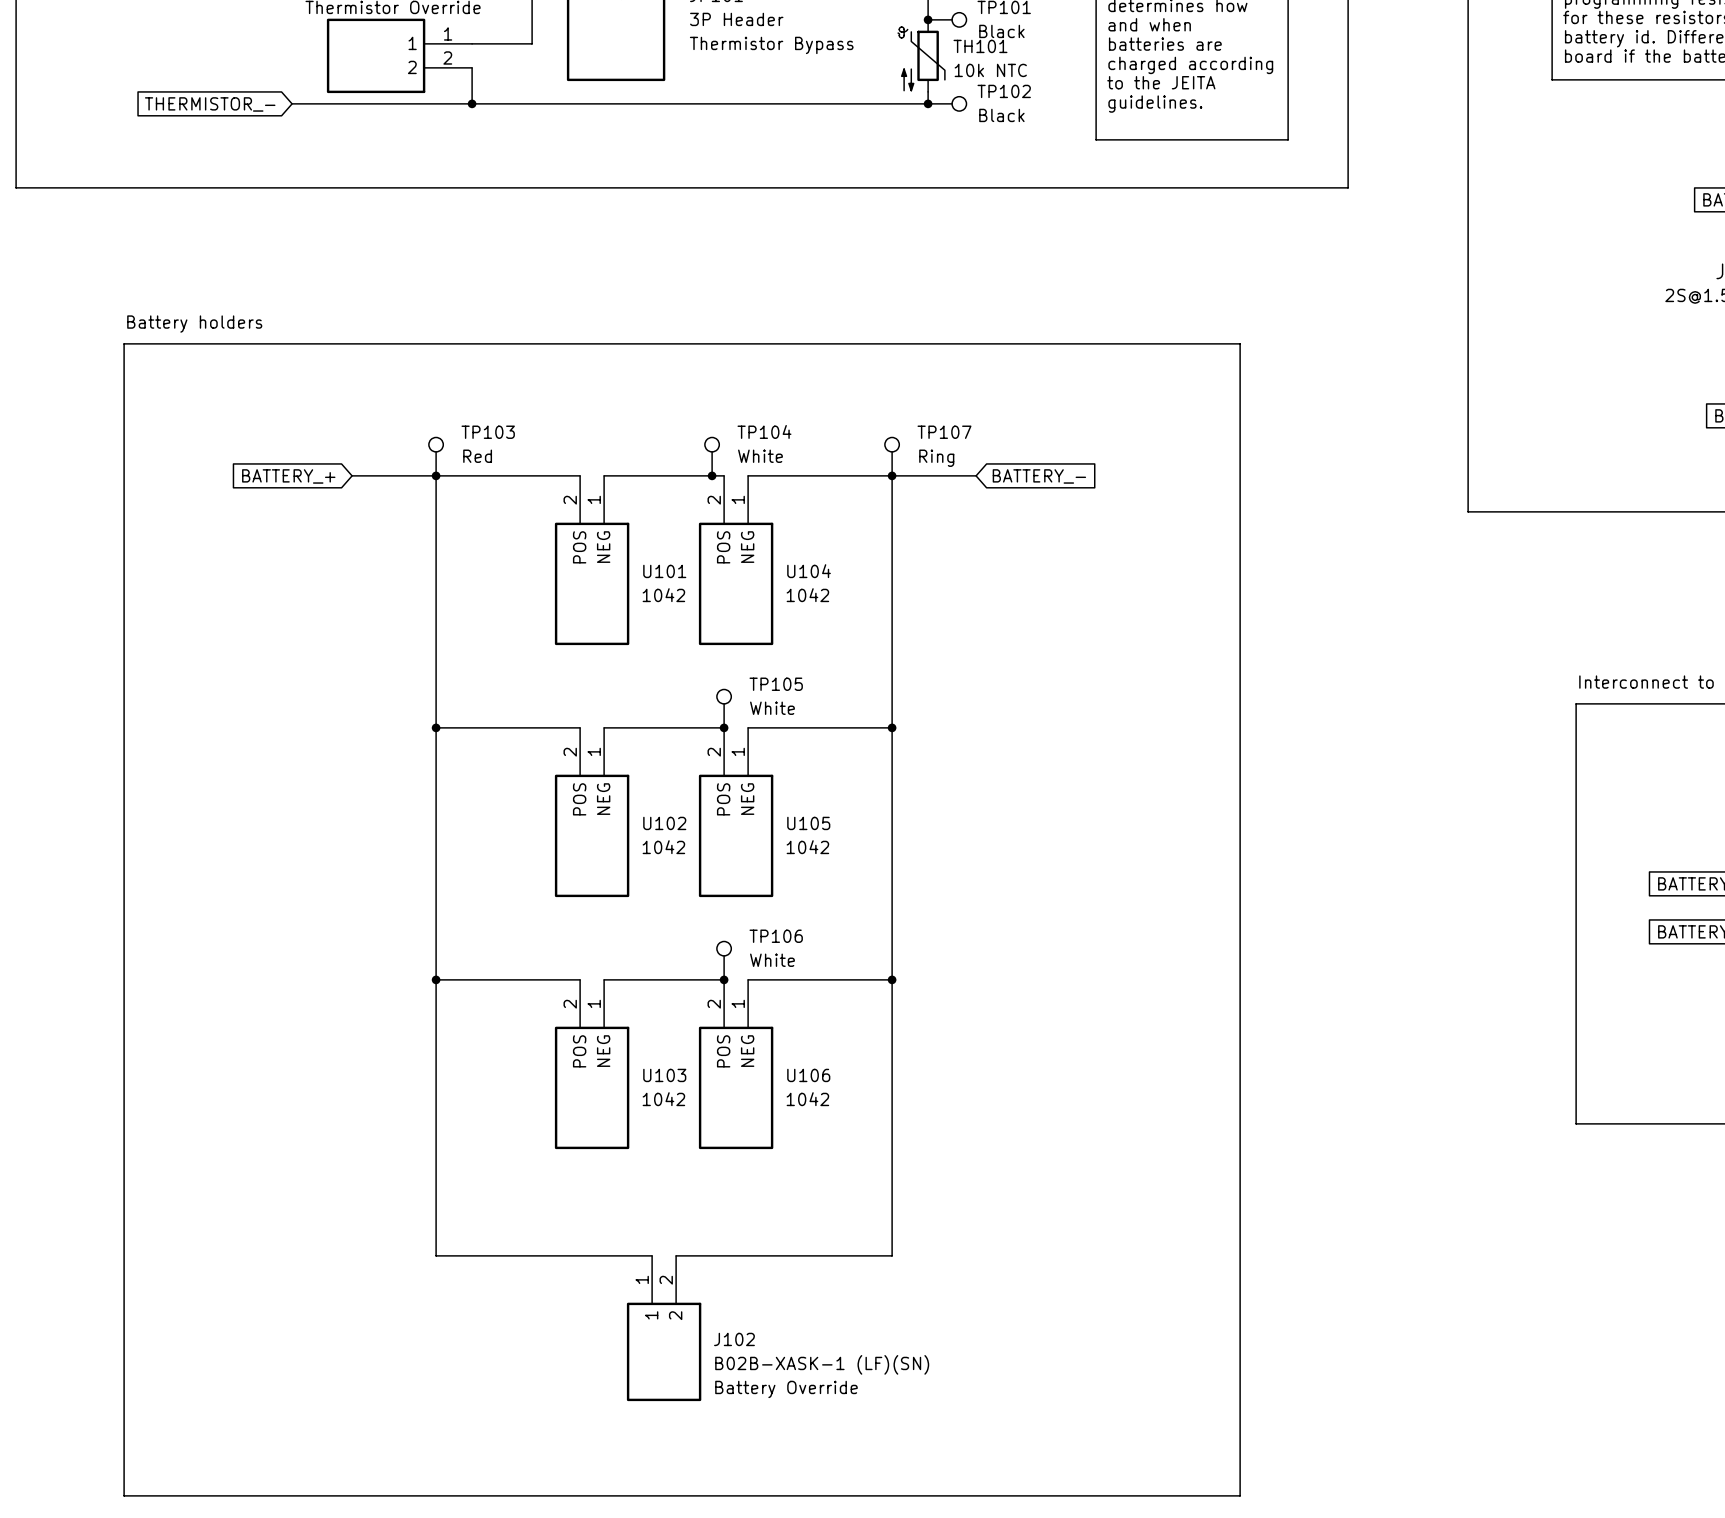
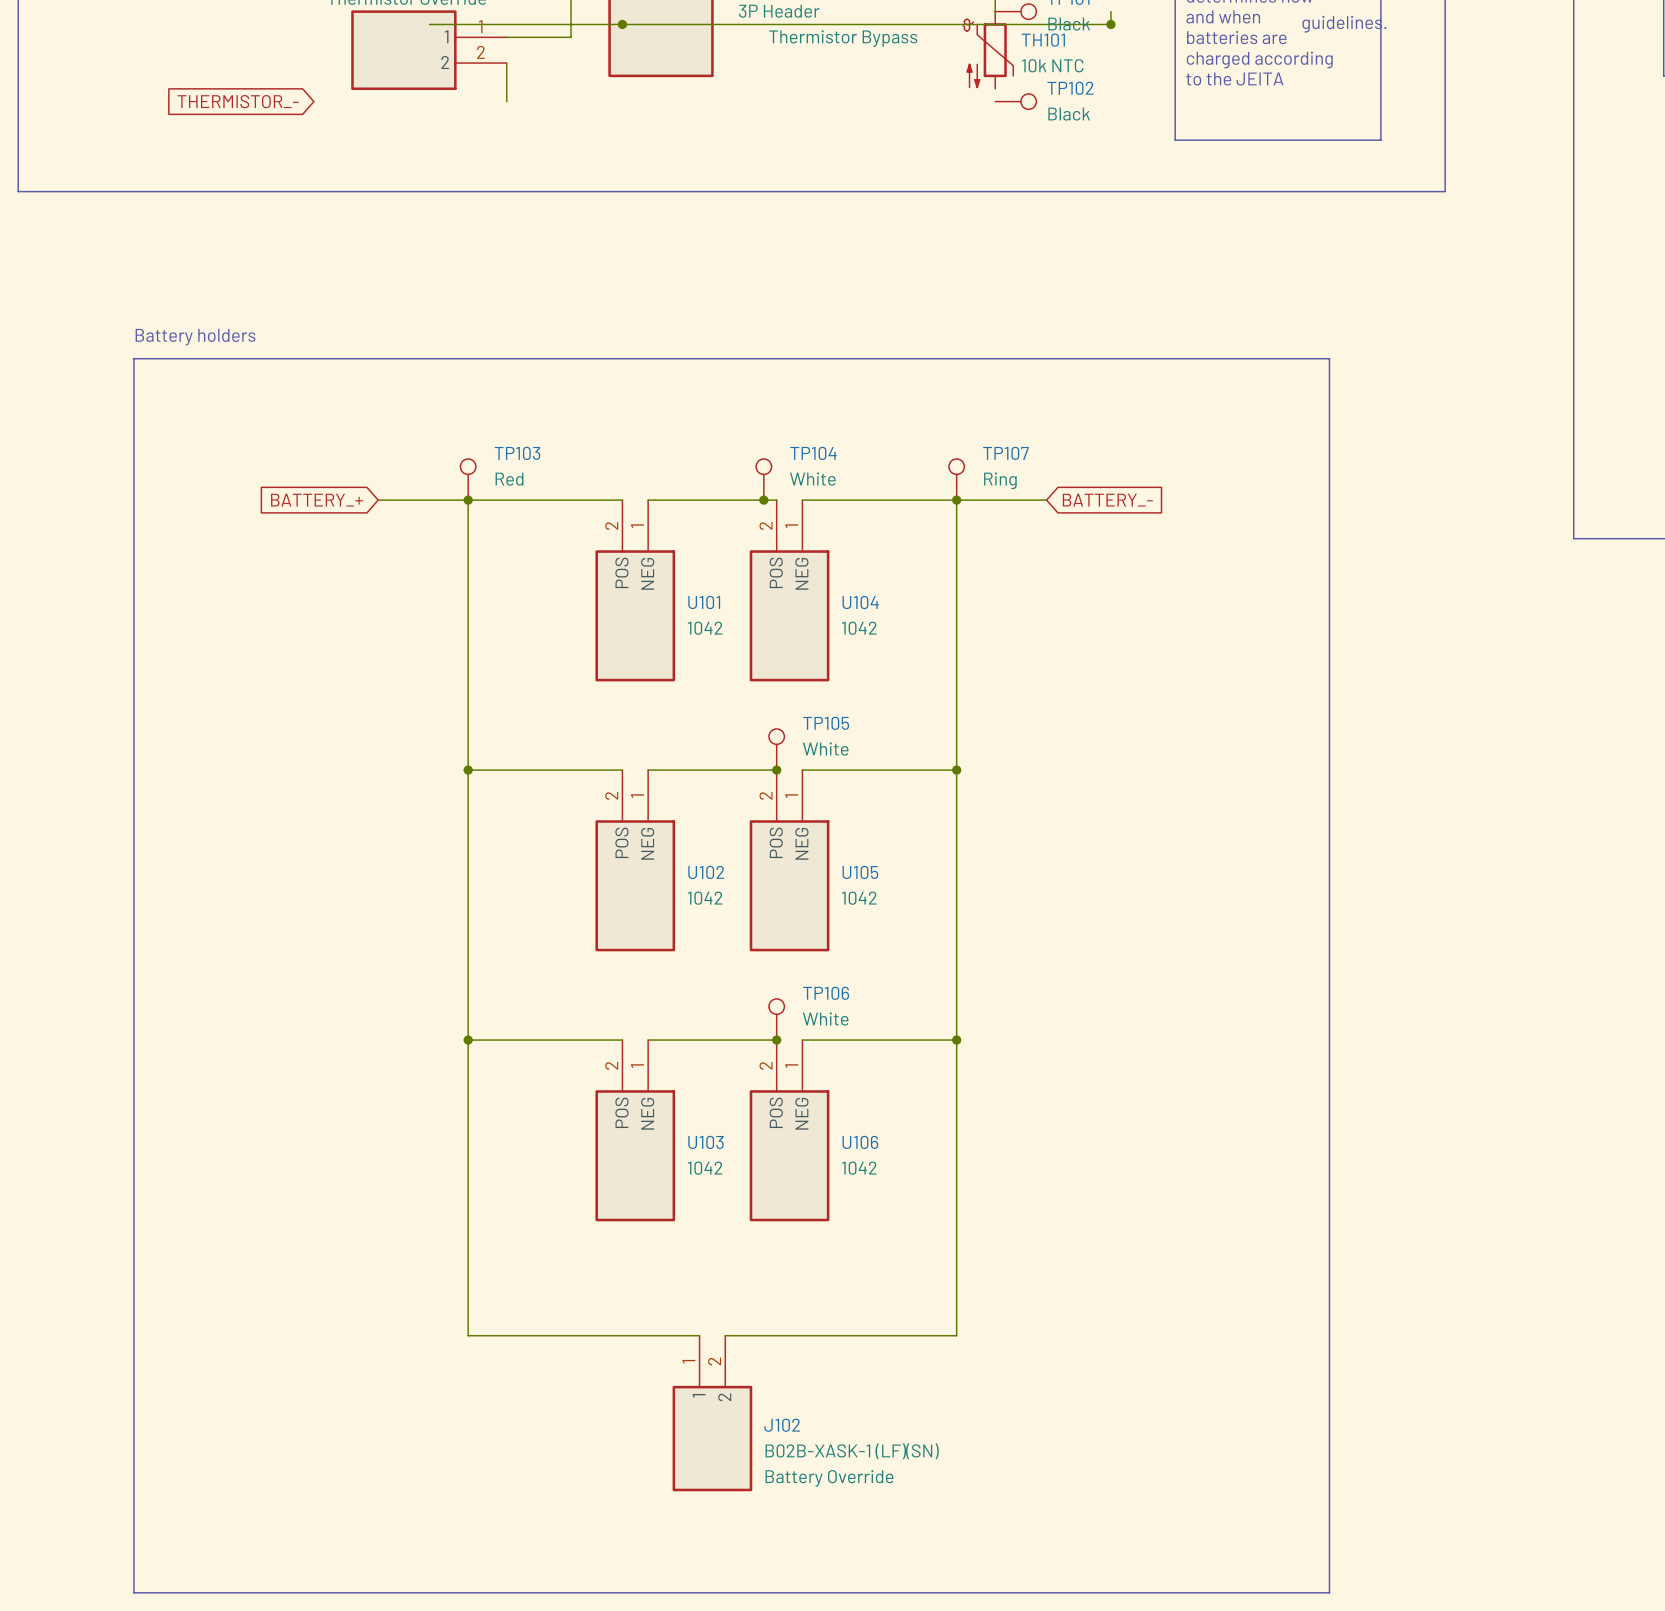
junction: (928, 19) -> none
junction: none -> (622, 24)
junction: none -> (1110, 24)
wire: (928, 91) (928, 103) (292, 103) -> (1110, 11) (1110, 24) (429, 24)
junction: (472, 103) -> none
junction: (928, 103) -> none
text position: guidelines. (1155, 104) -> guidelines. (1344, 24)

